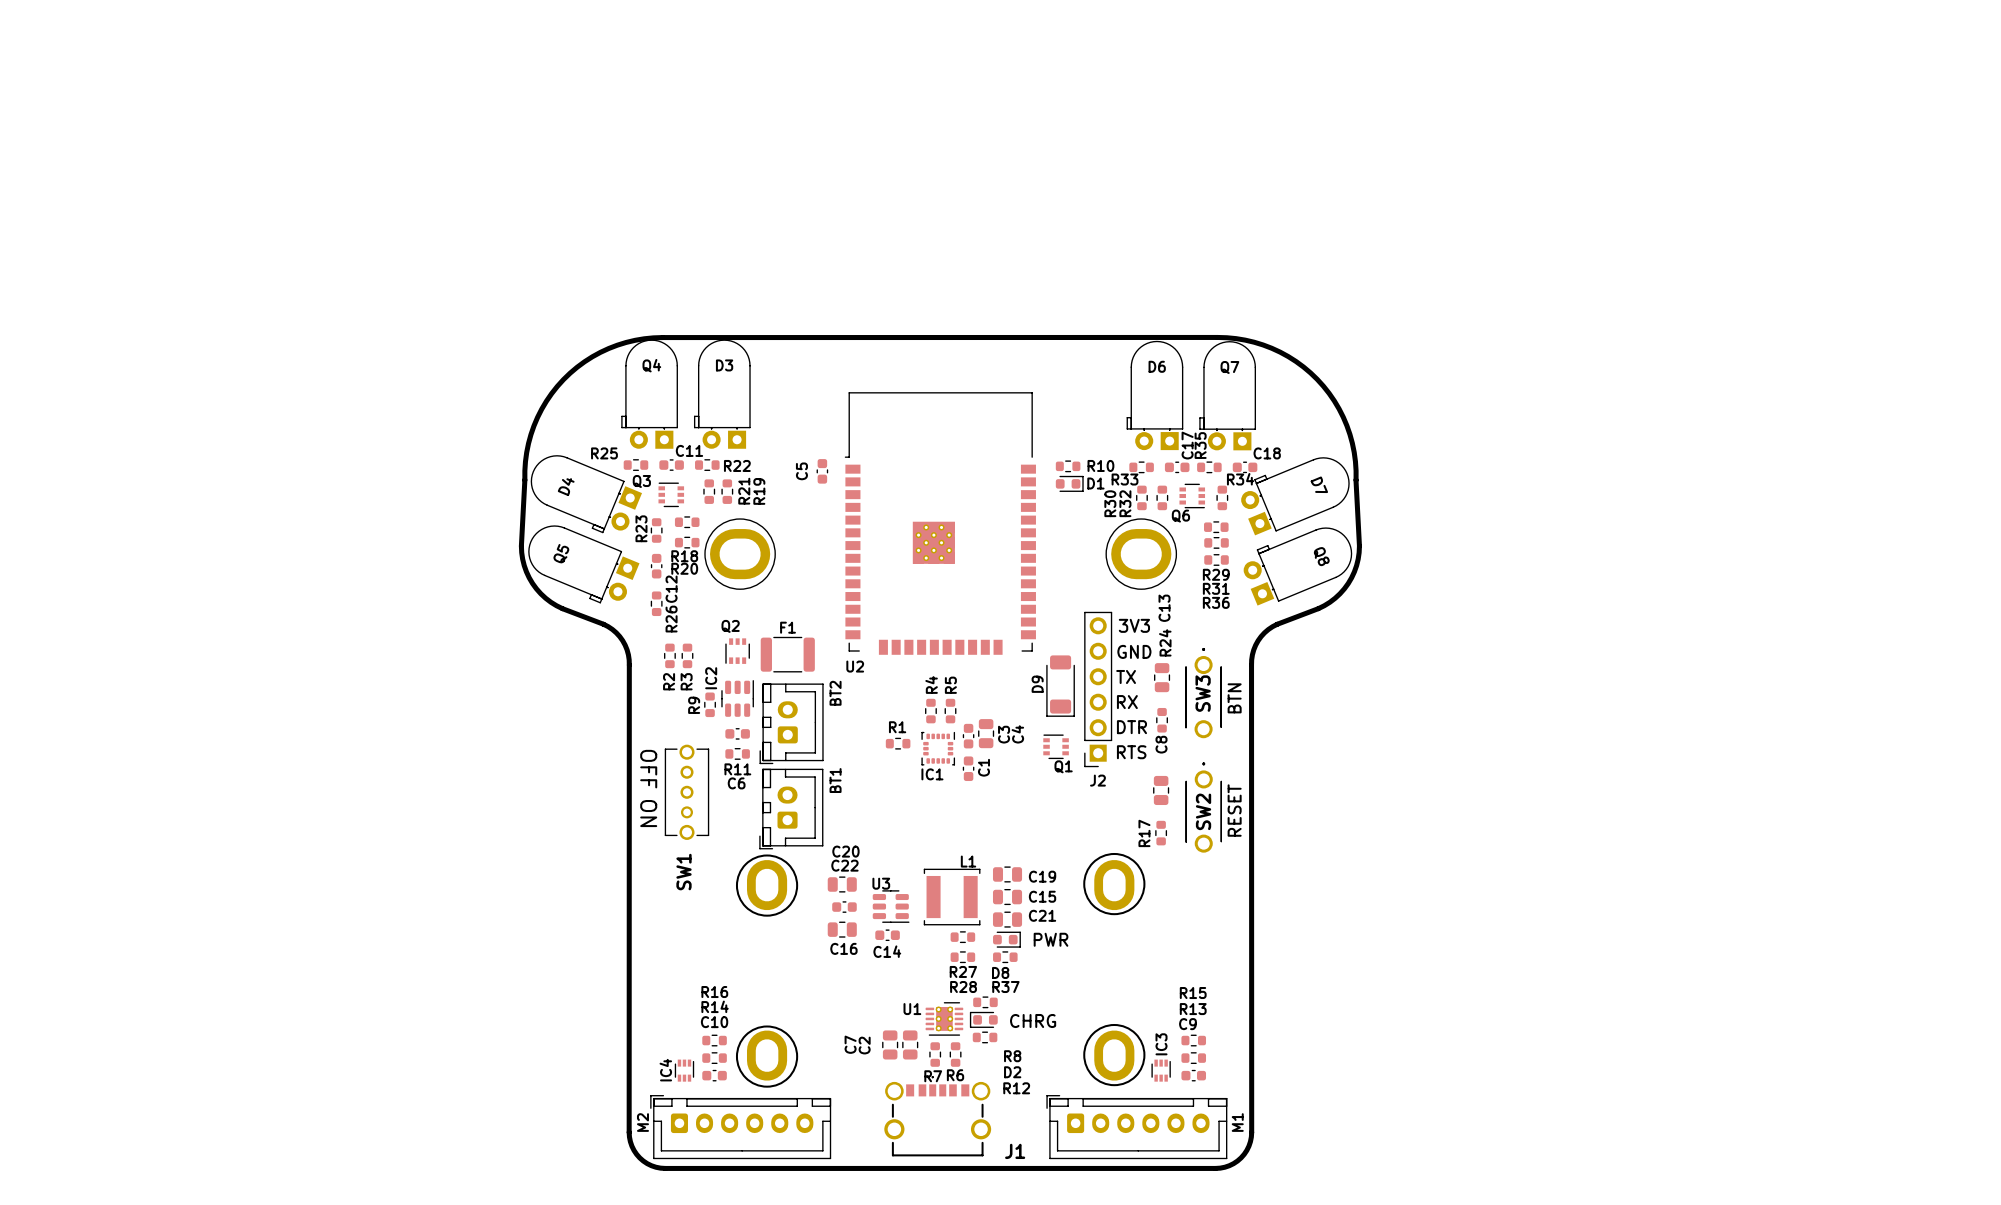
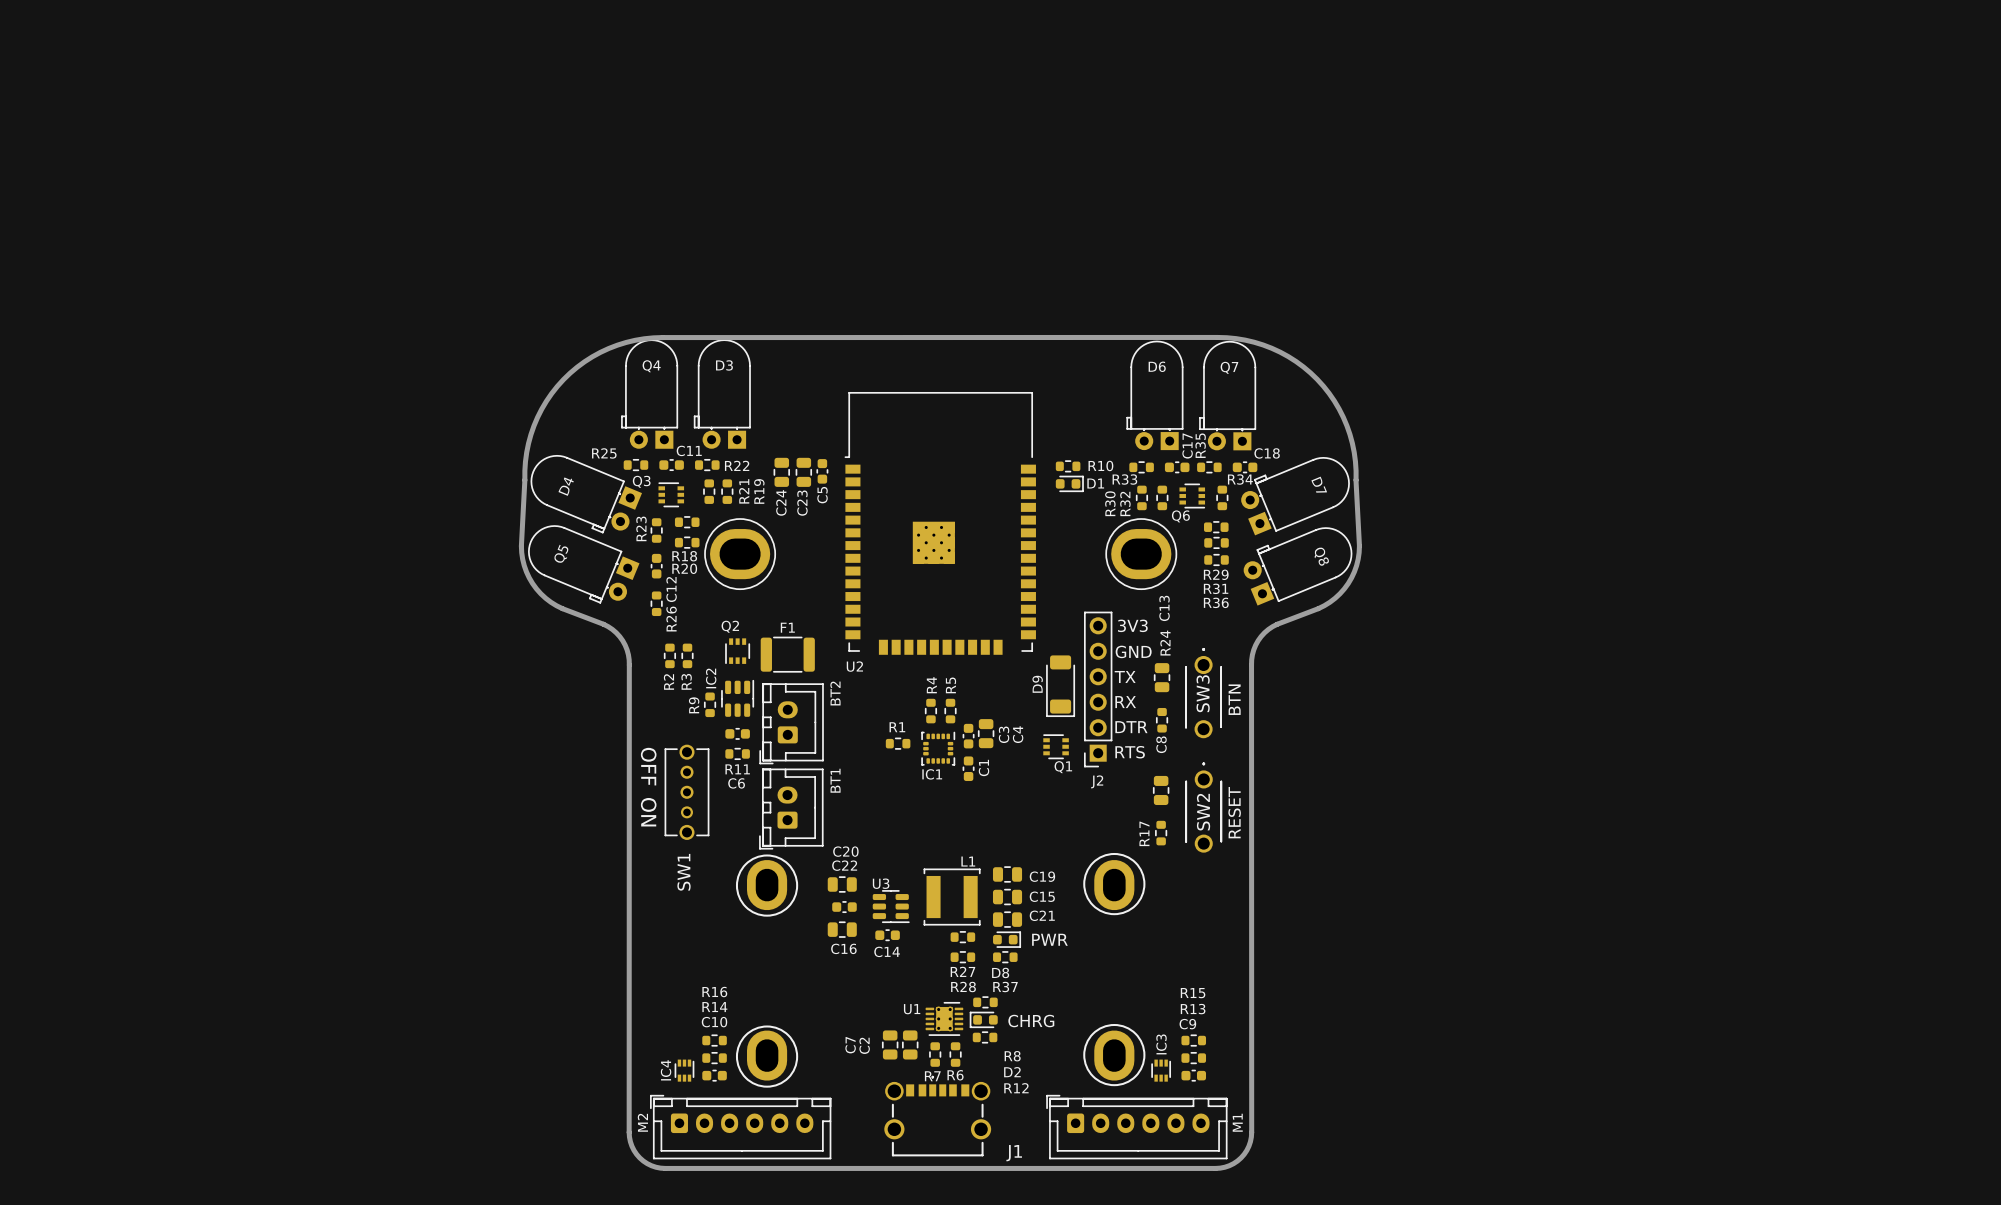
C5 name position: C5 (801, 471) -> C5 (822, 495)
C24: none -> (781, 472)
C23: none -> (803, 472)

